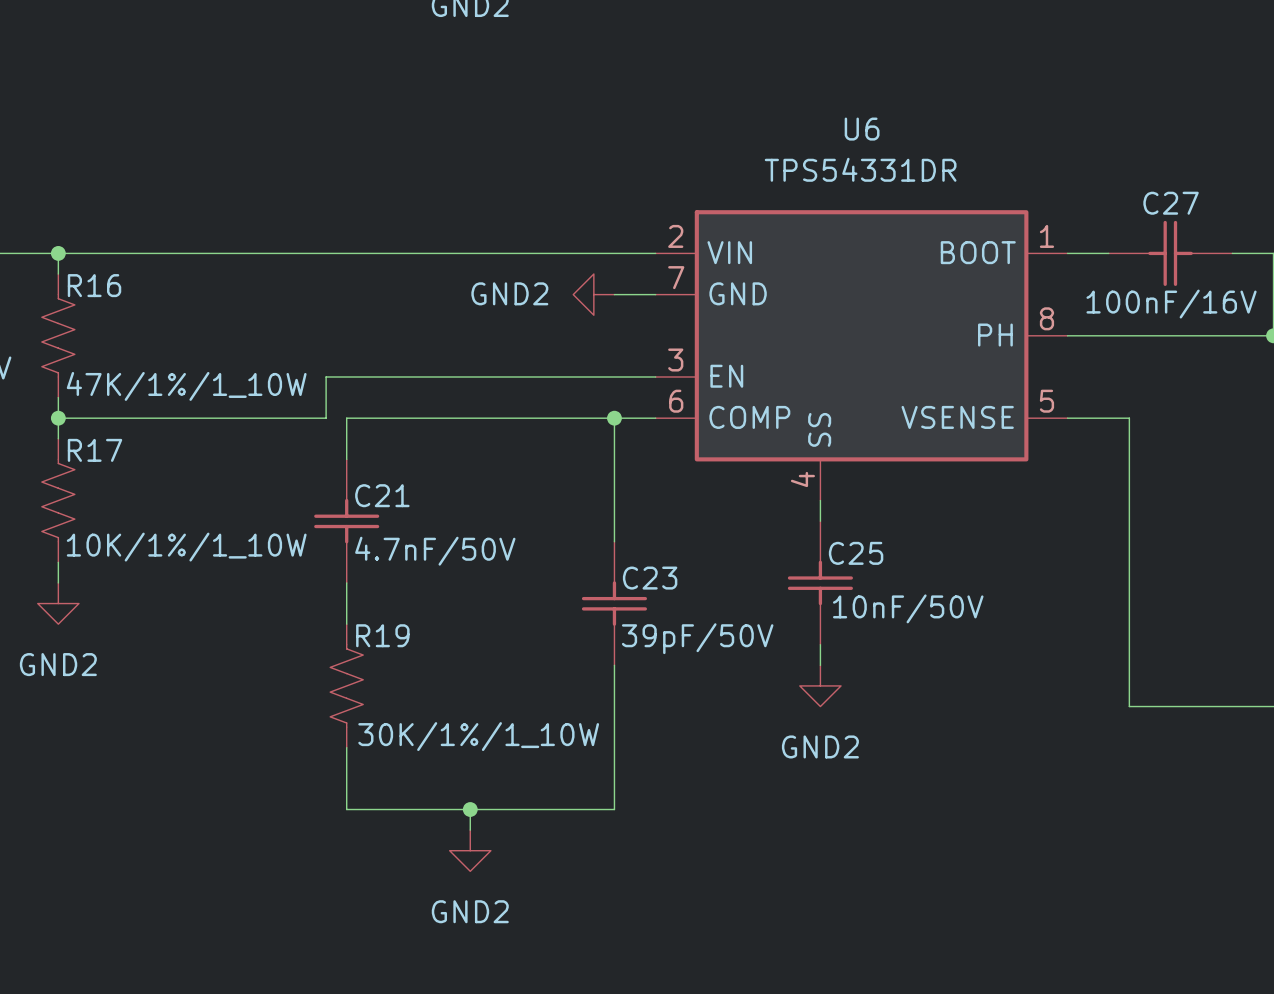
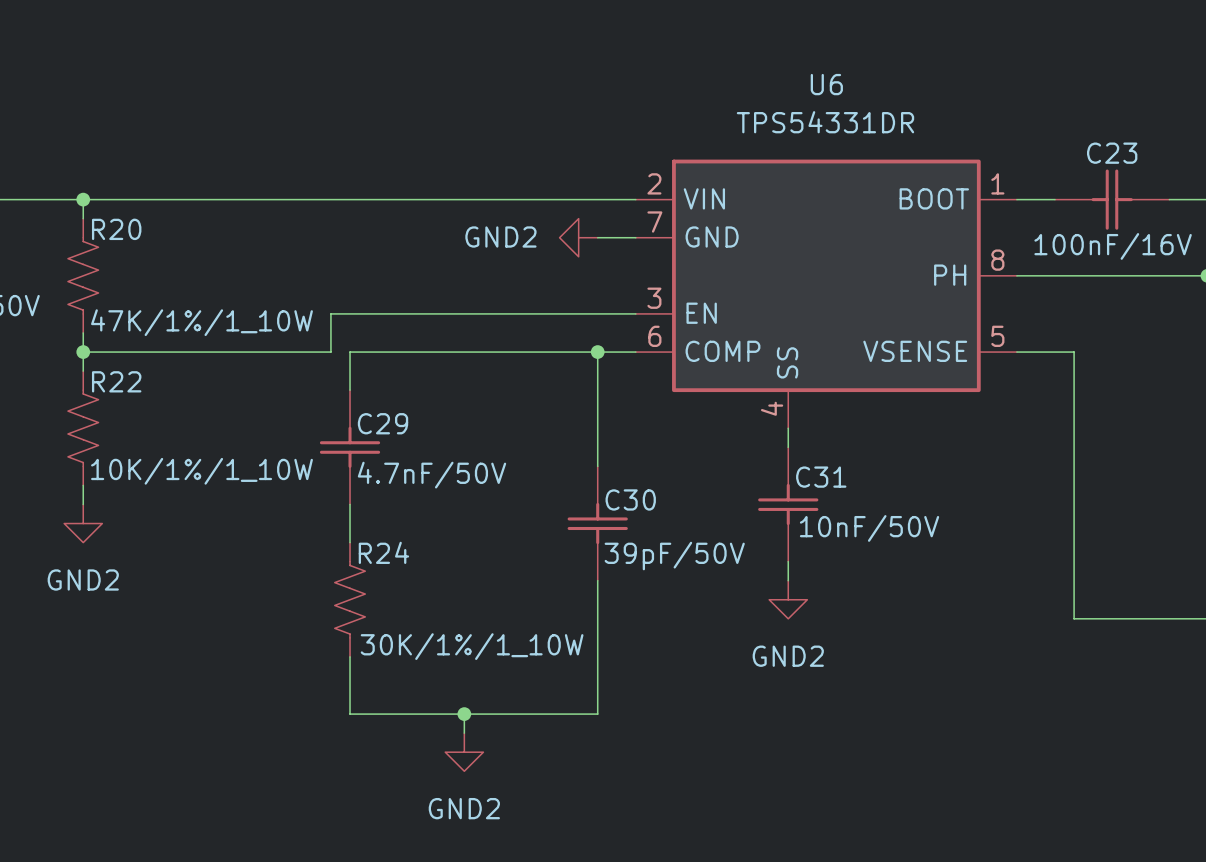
C27 name: C27 (1171, 203) -> C23 (1112, 153)
R16 name: R16 (94, 285) -> R20 (116, 229)
R17 name: R17 (94, 450) -> R22 (116, 381)
C21 name: C21 (382, 495) -> C29 (383, 423)
C25 name: C25 (856, 553) -> C31 (821, 477)
C23 name: C23 (650, 578) -> C30 (630, 499)
R19 name: R19 (382, 635) -> R24 (383, 552)

